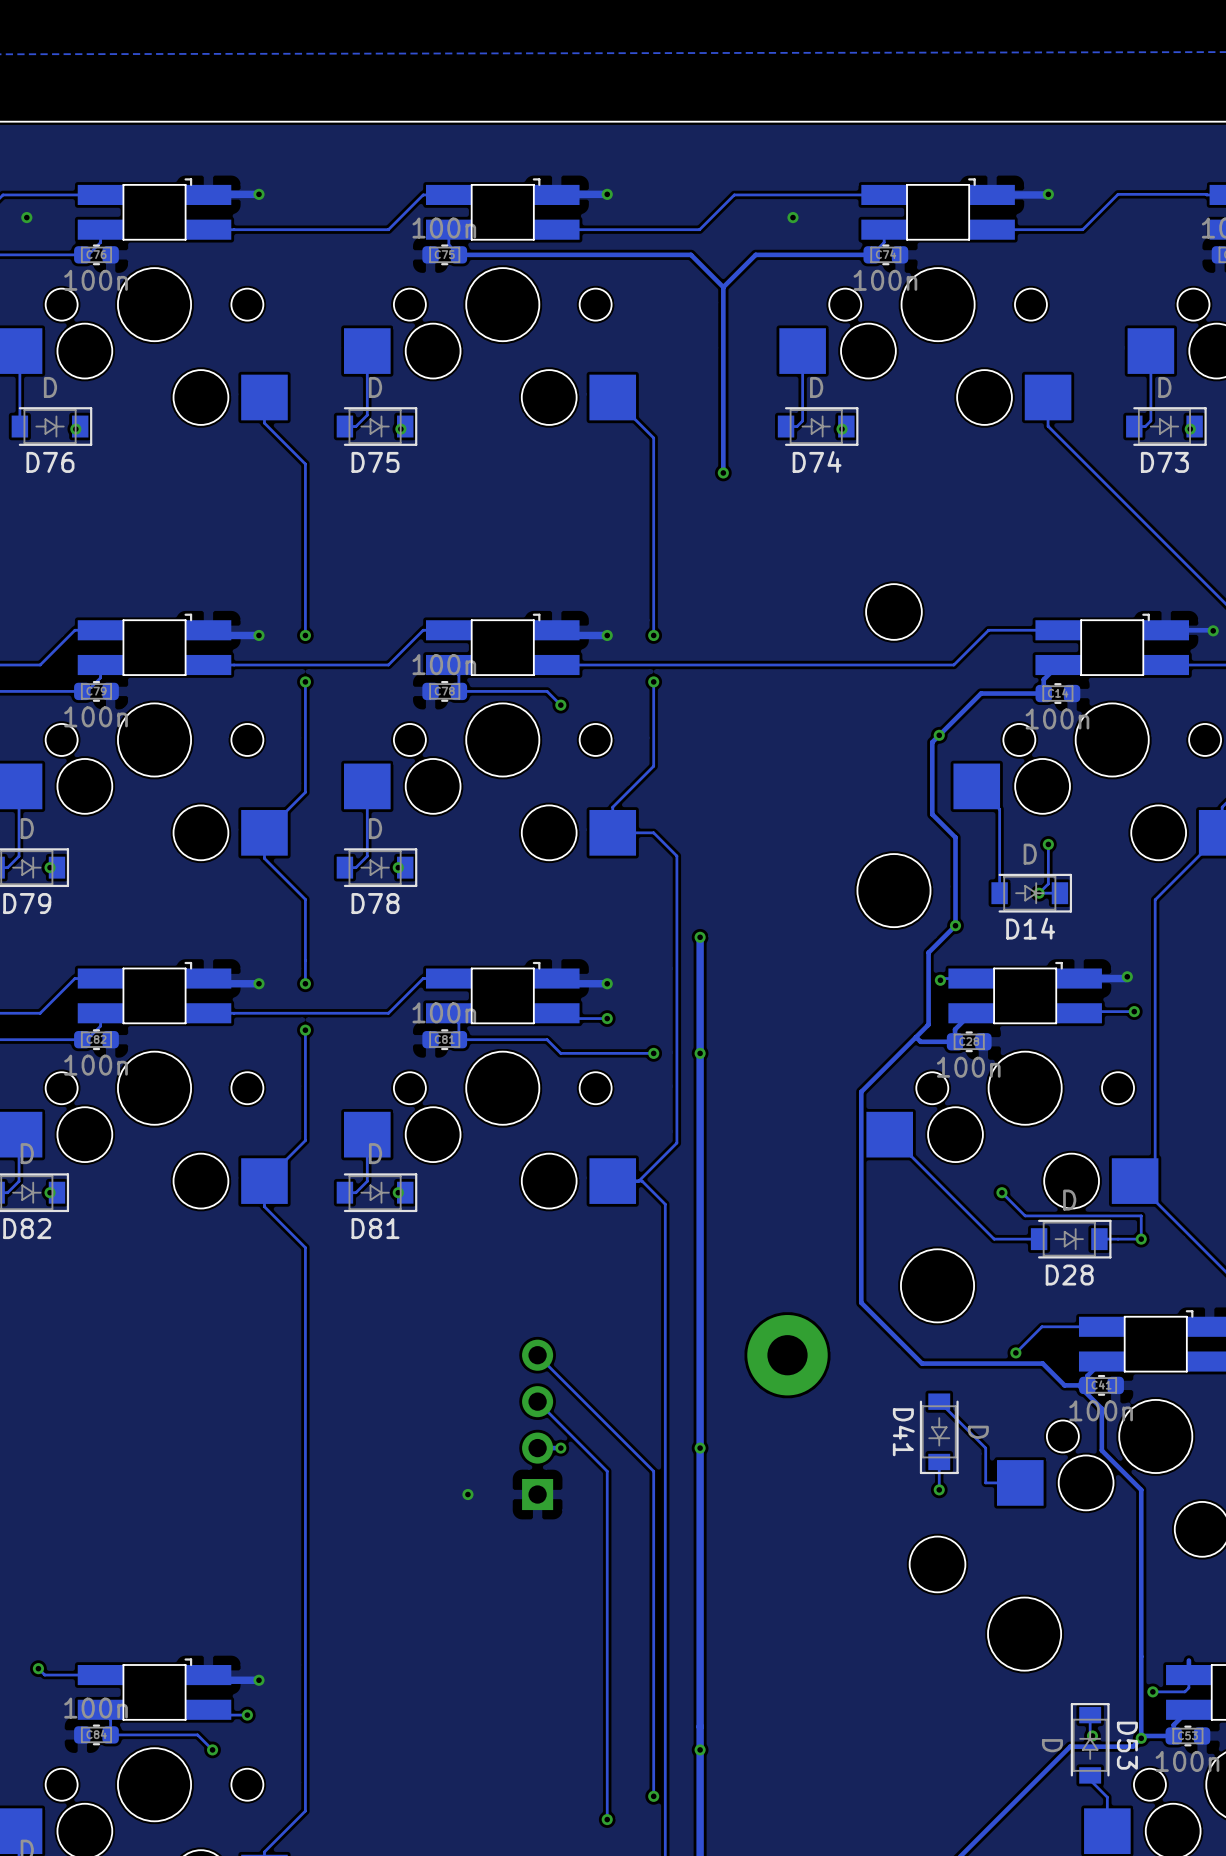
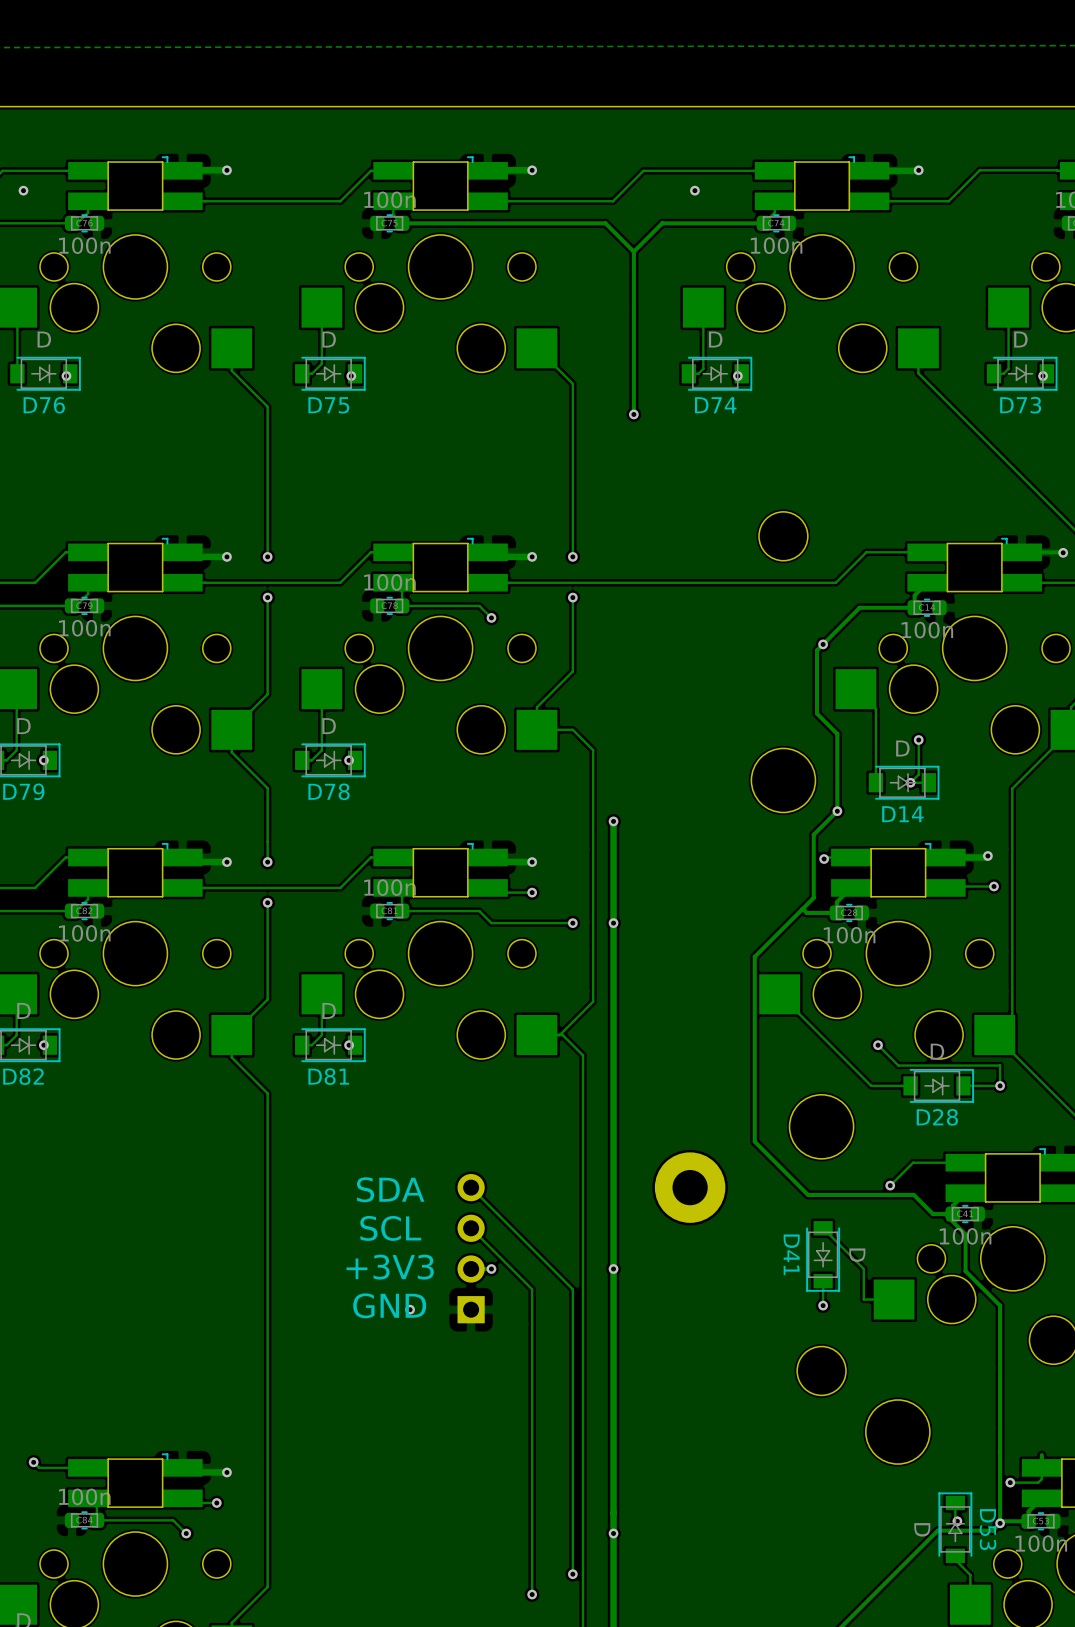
text: none -> SDA (390, 1189)
text: none -> SCL (390, 1228)
text: none -> +3V3 (390, 1267)
text: none -> GND (389, 1305)

